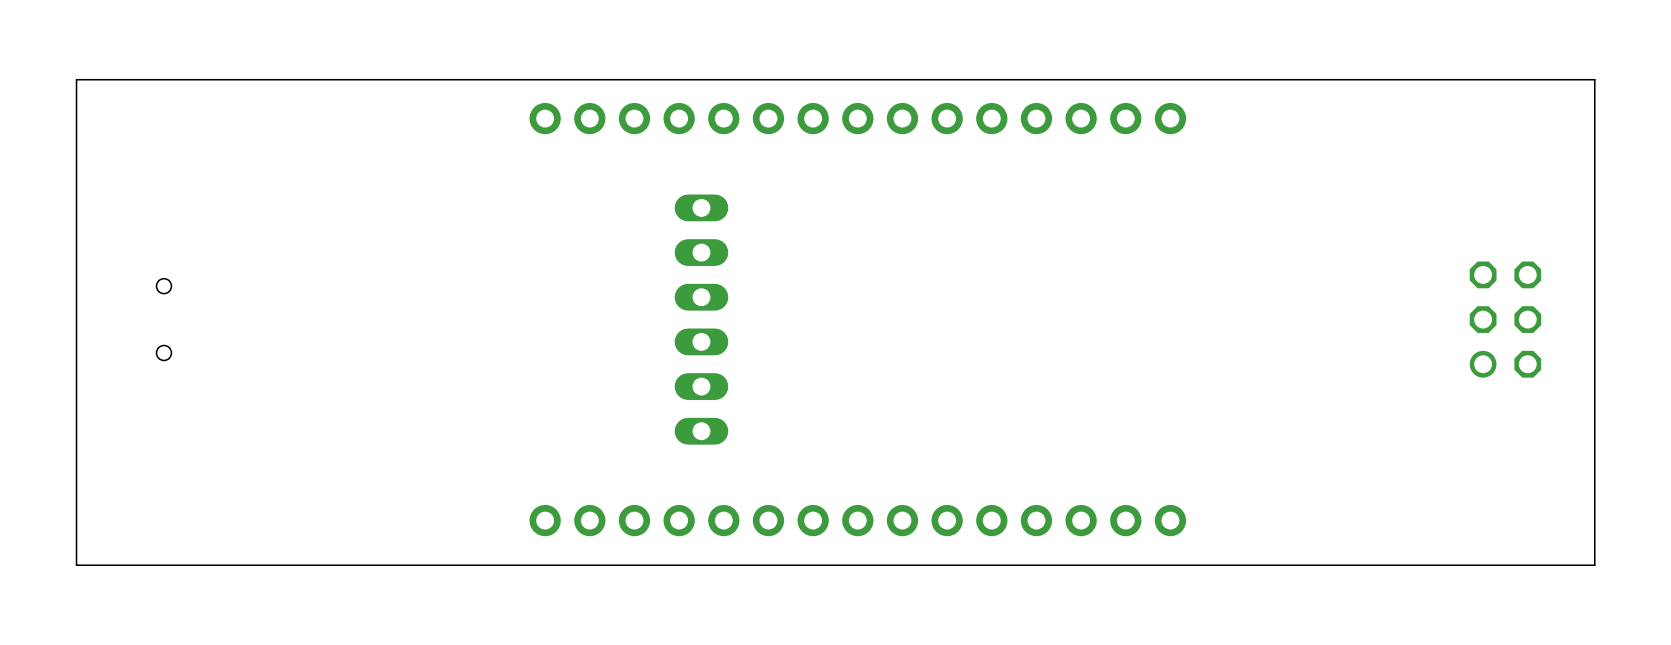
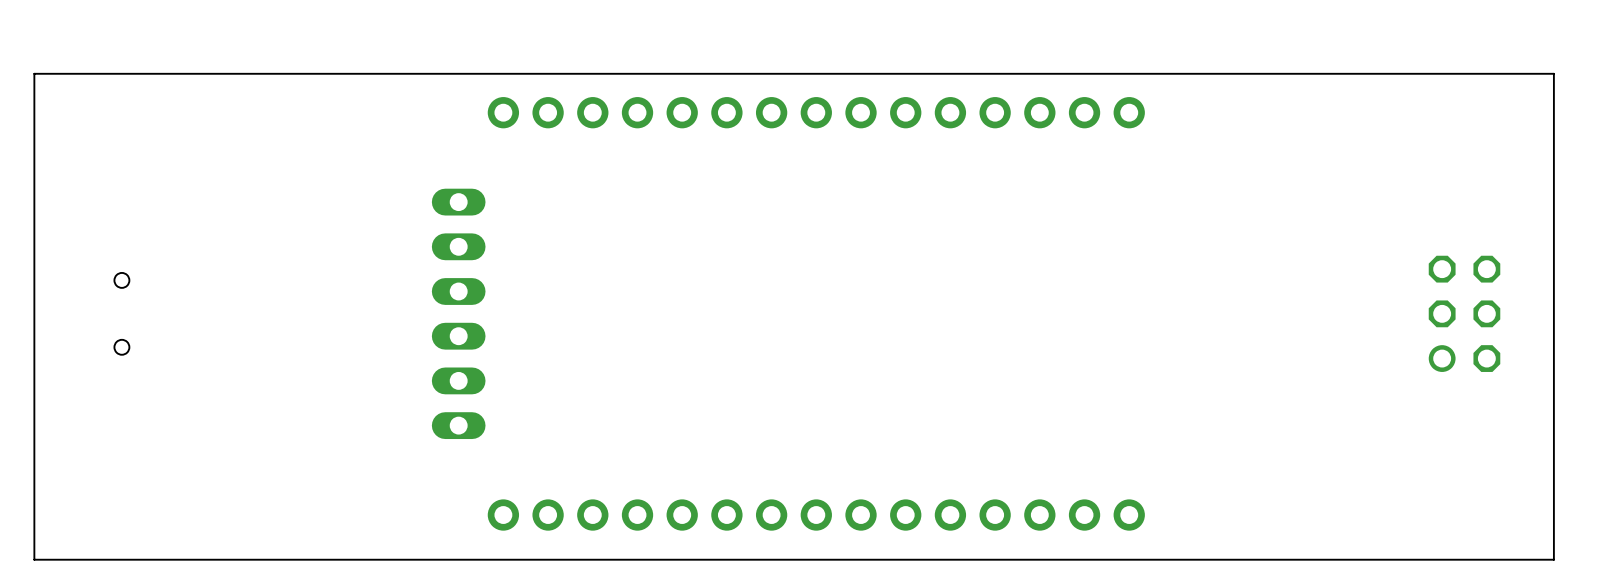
part position: (701, 319) -> (458, 313)

